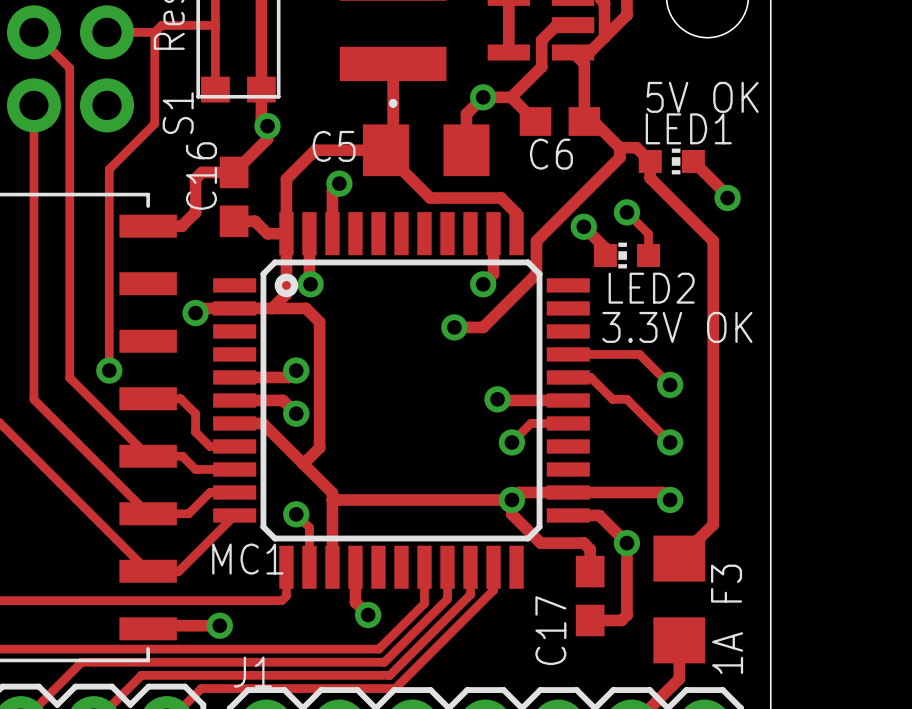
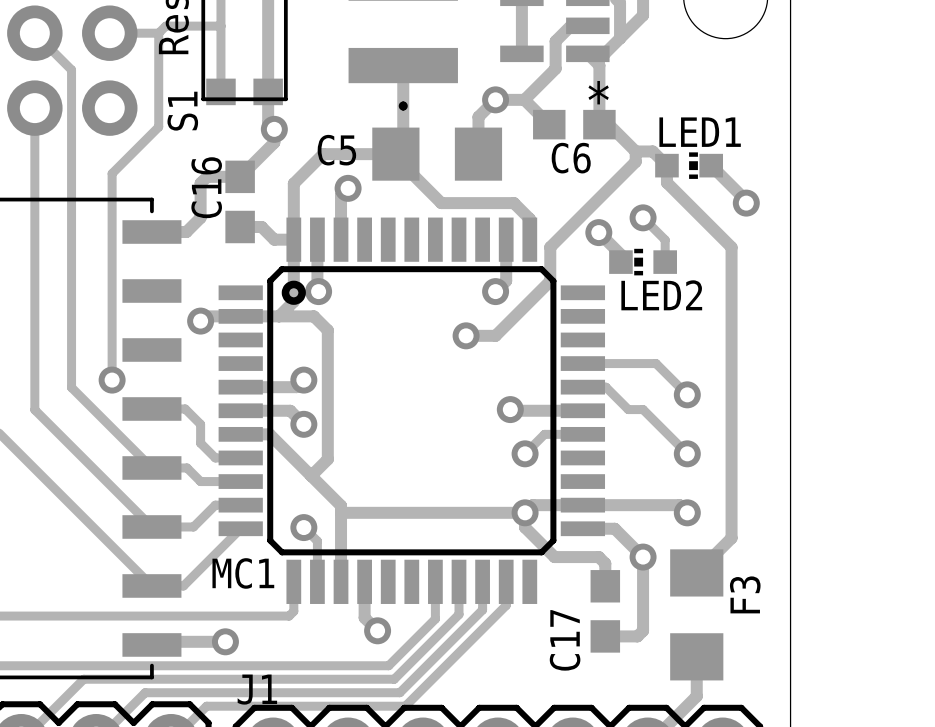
part text: none -> * (598, 92)
text: 5V OK (702, 97) -> none
text: 3.3V OK (677, 327) -> none
text: 1A (727, 653) -> none

